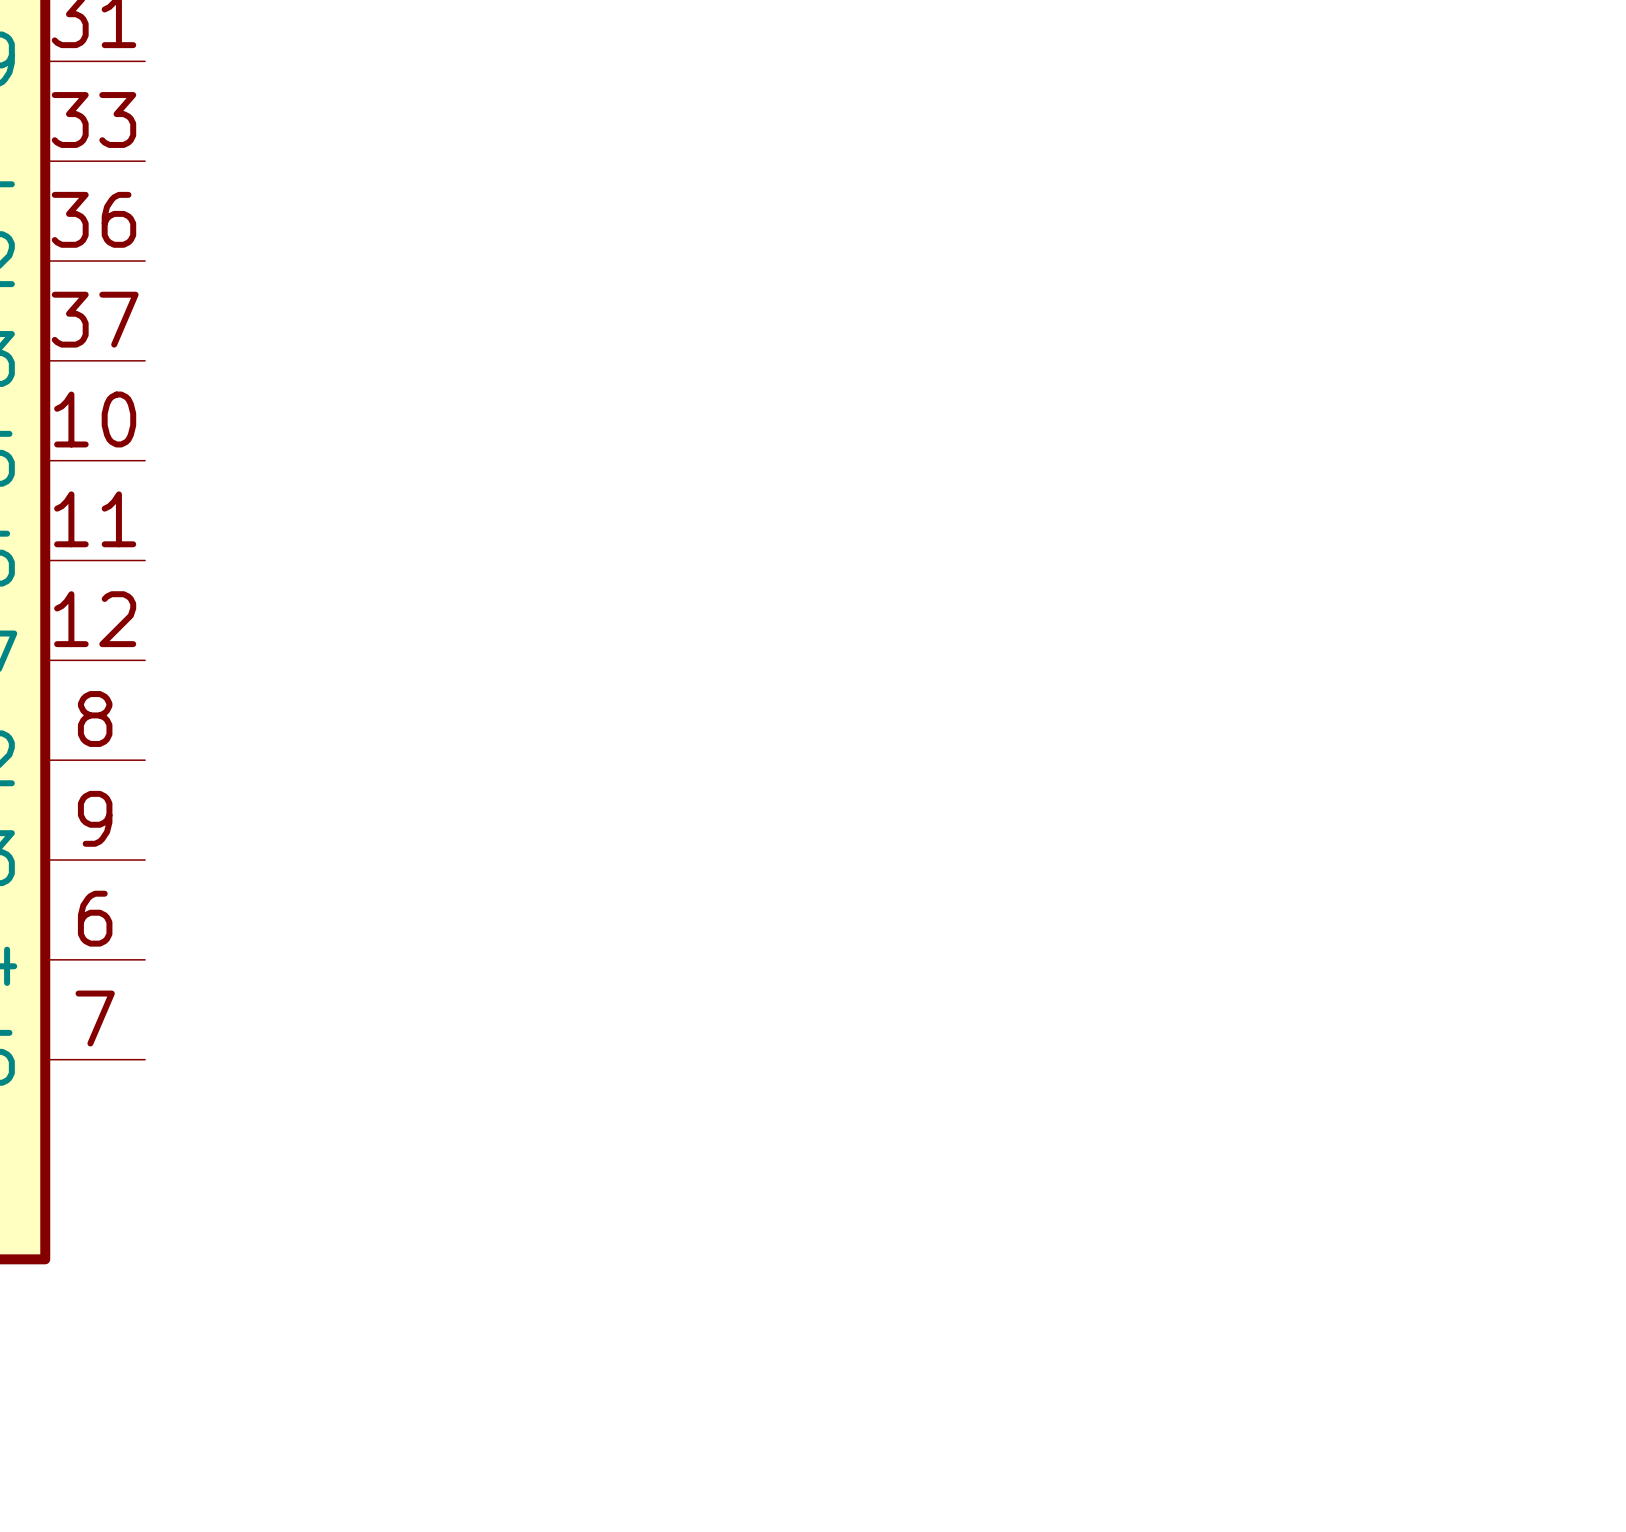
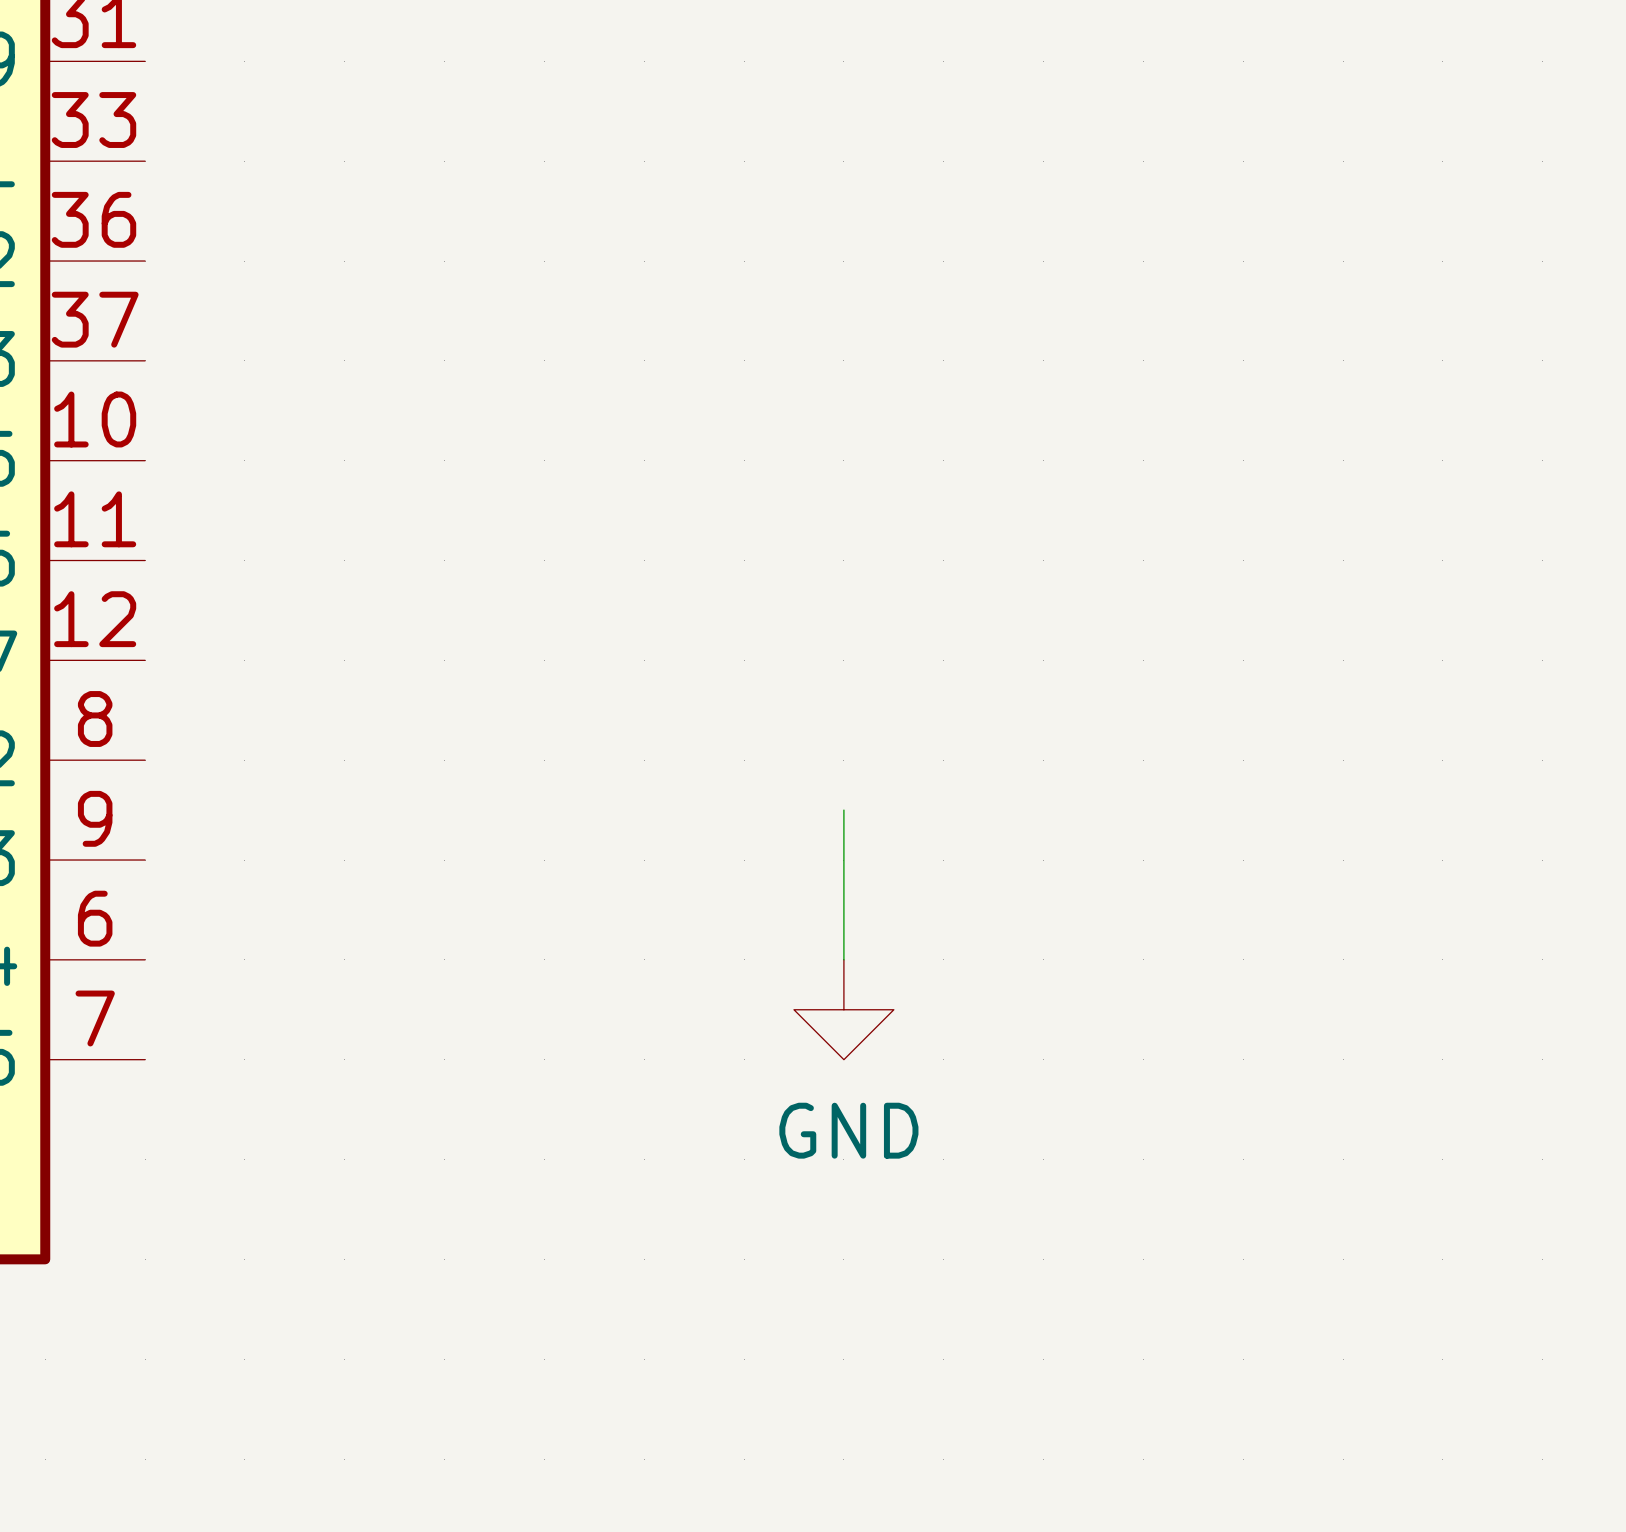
wire: none -> (843, 810) (843, 959)
power symbol: none -> GND (843, 1009)

